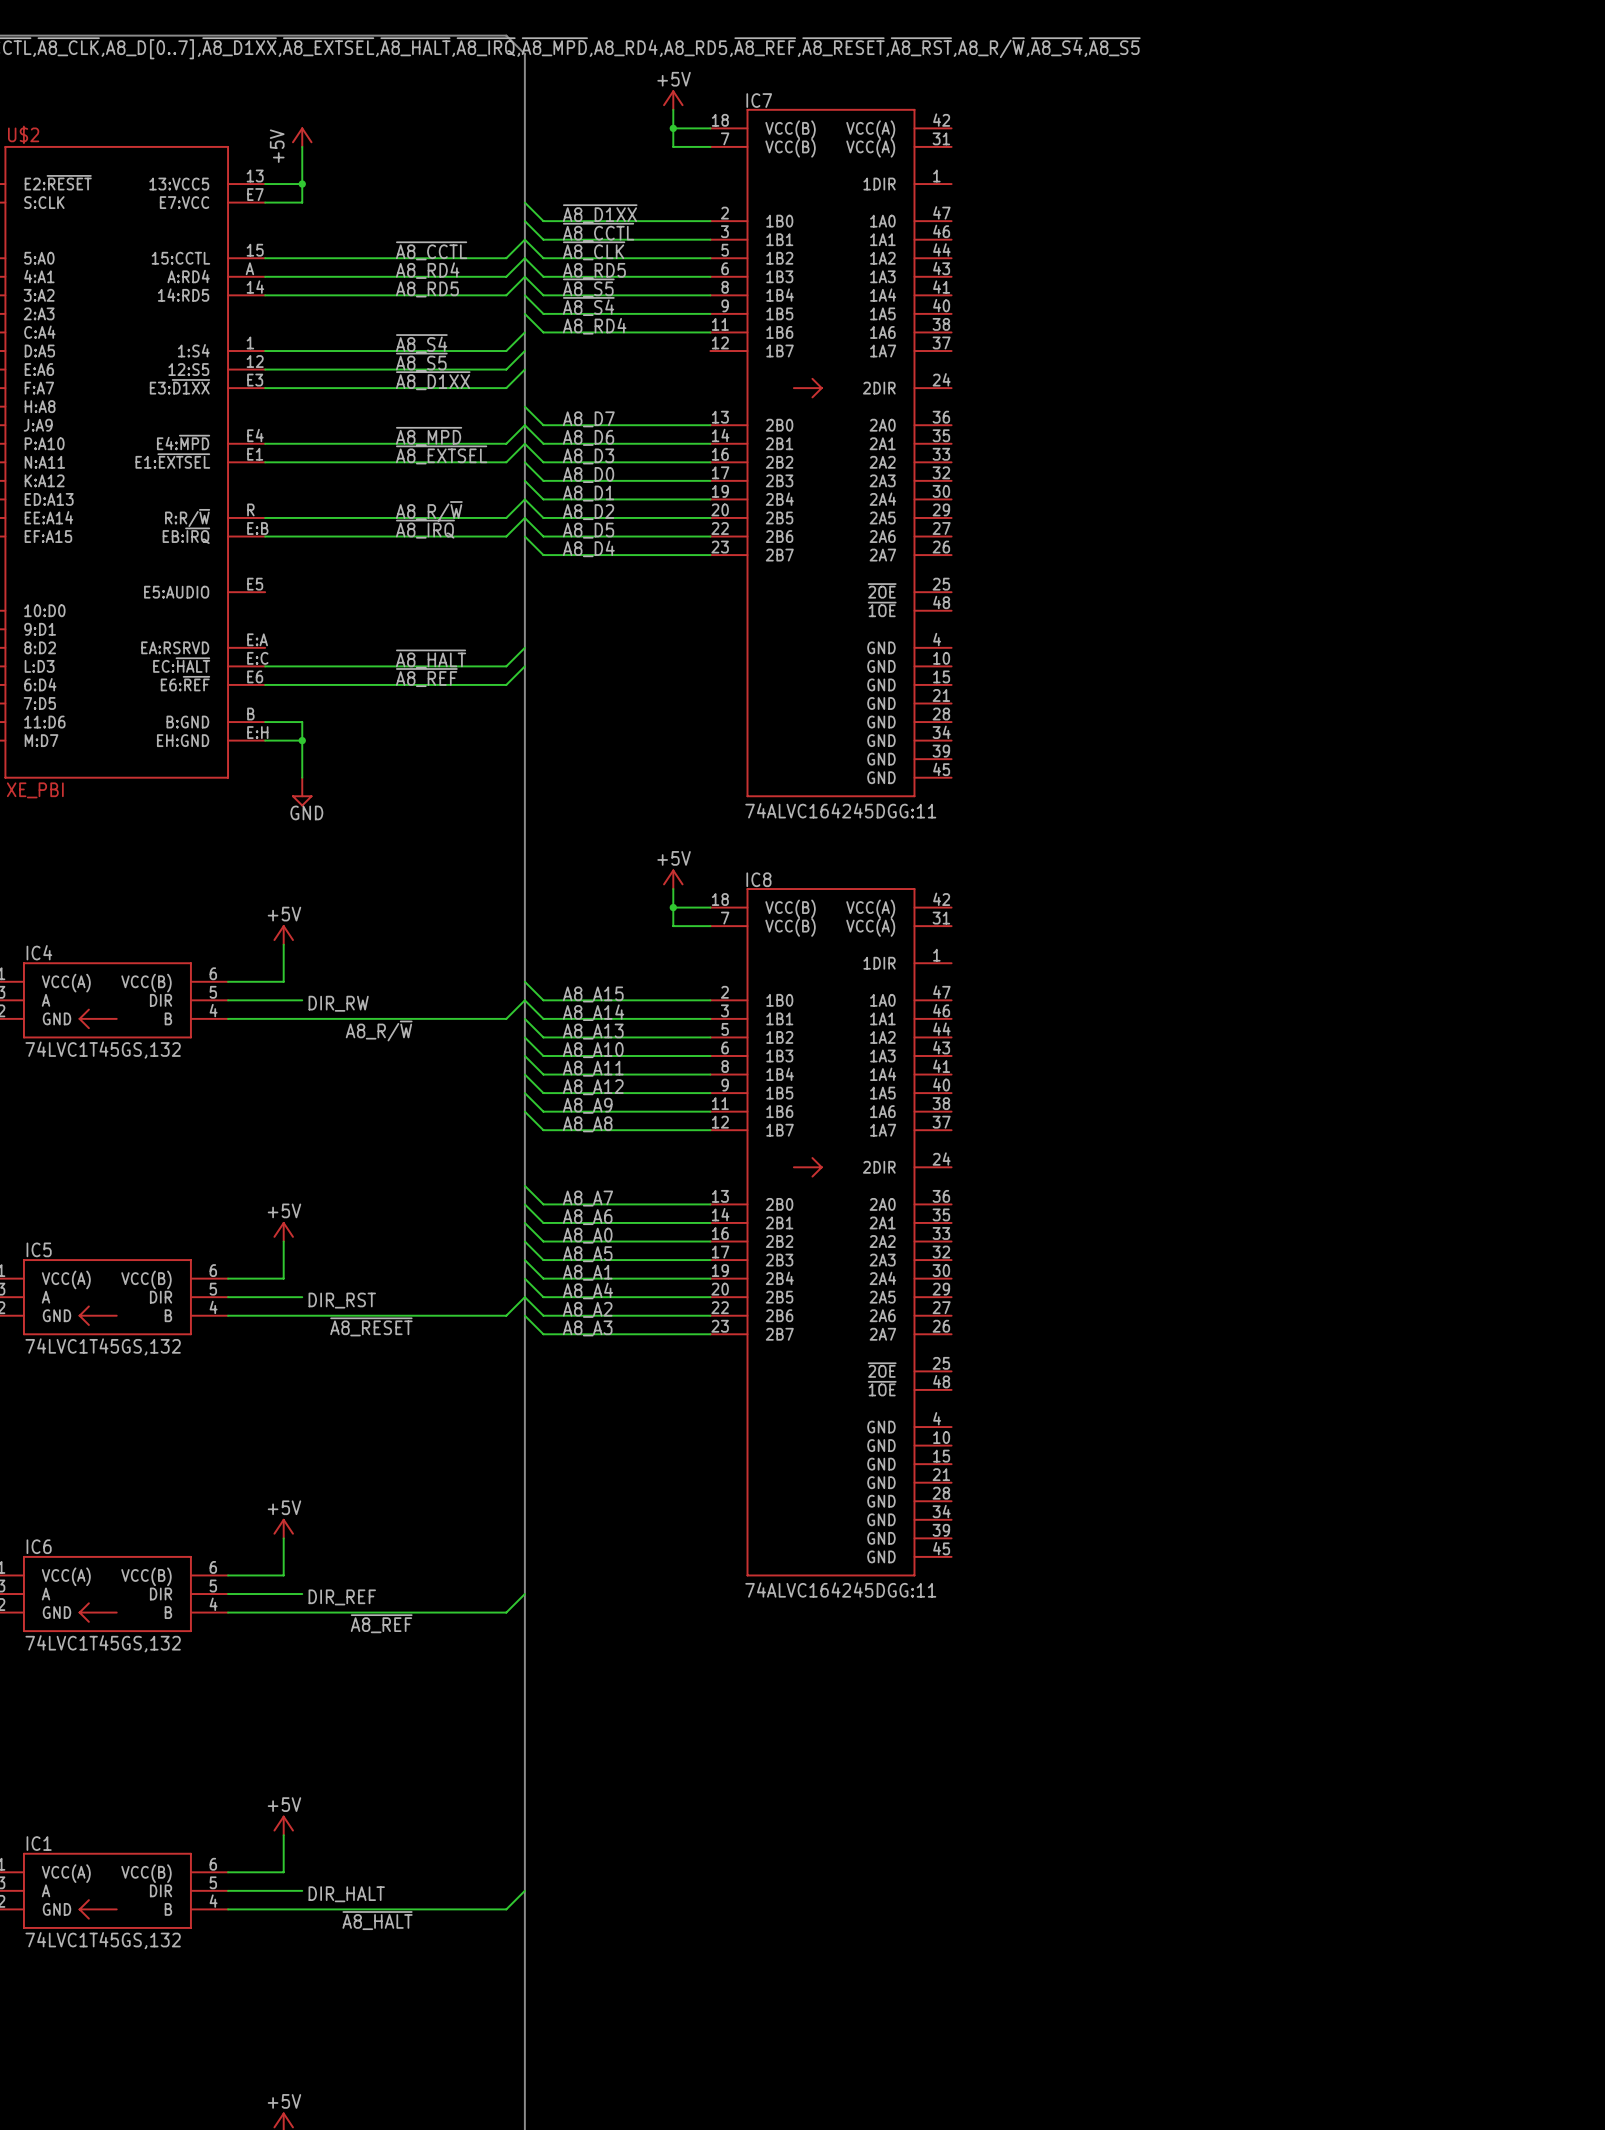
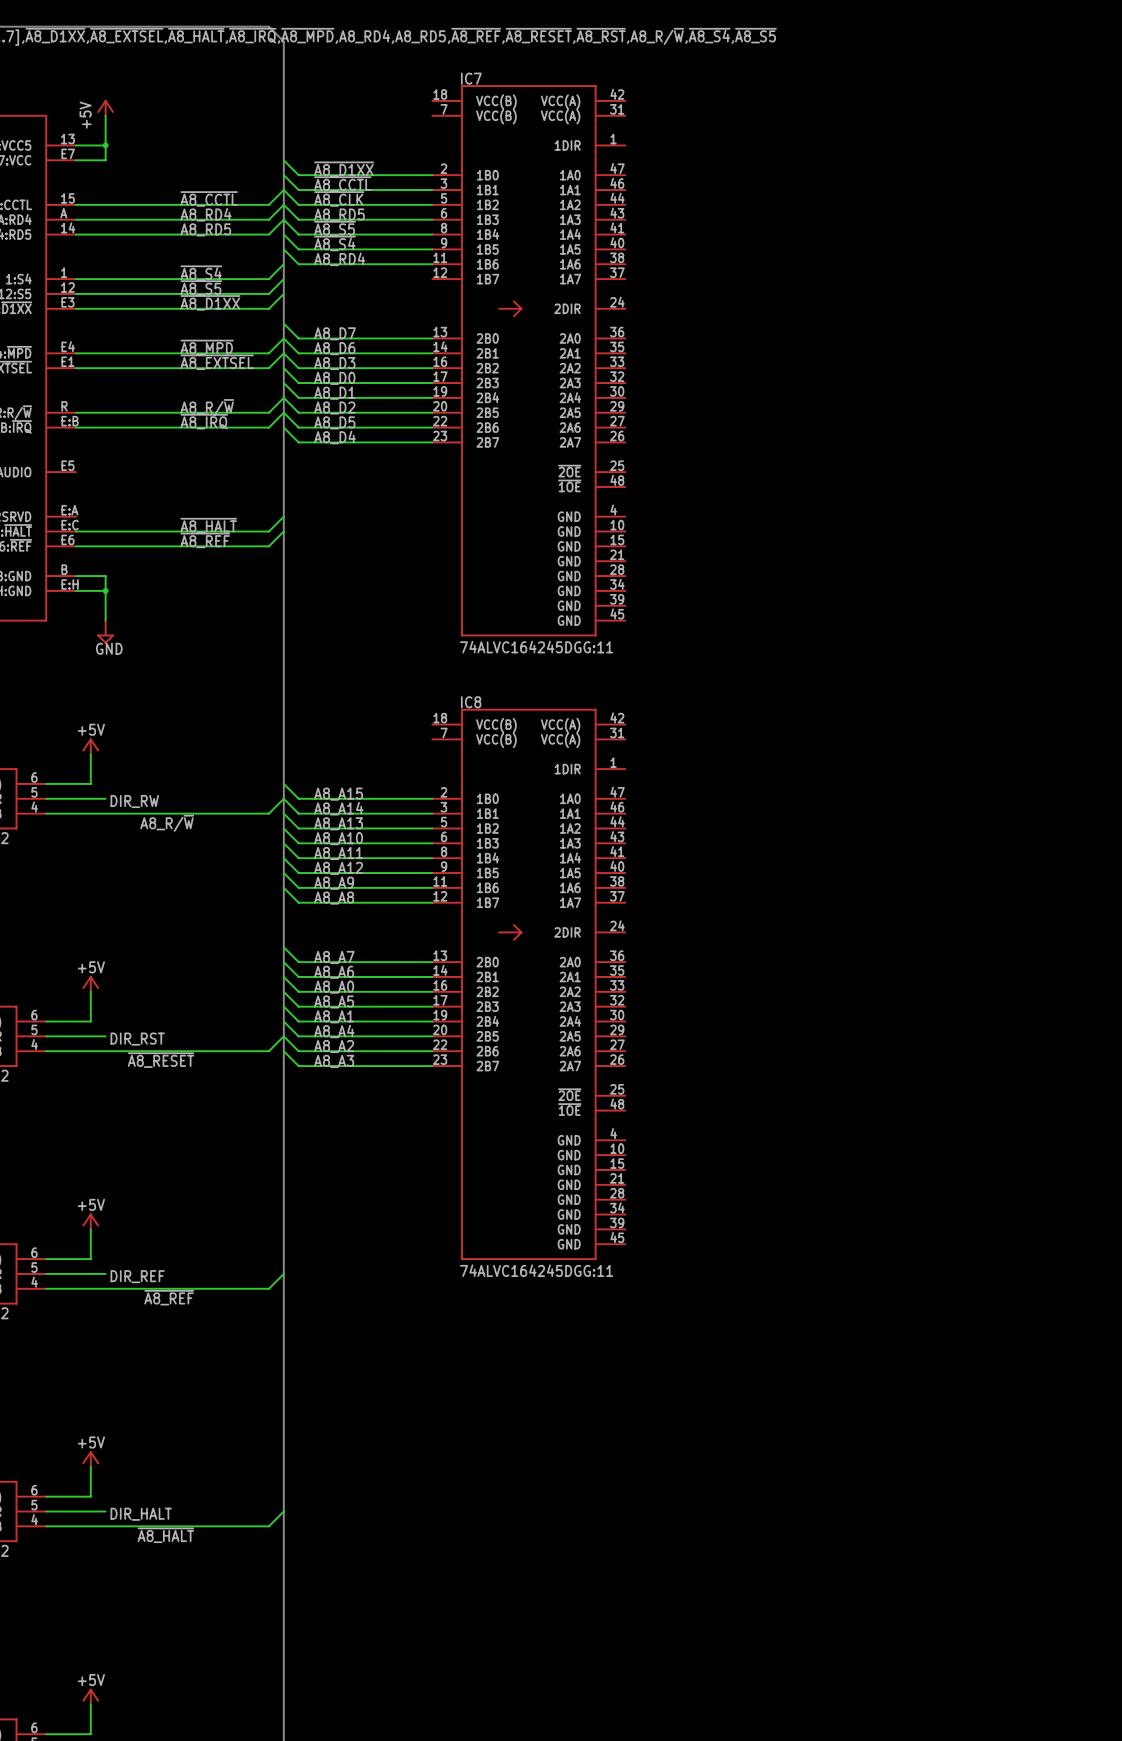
power symbol: +5V (673, 100) -> none
wire: (673, 109) (673, 146) (710, 146) -> none
wire: (673, 128) (710, 128) -> none
junction: (673, 128) -> none
power symbol: +5V (673, 879) -> none
wire: (673, 889) (673, 926) (710, 926) -> none
wire: (673, 907) (710, 907) -> none
junction: (673, 907) -> none

